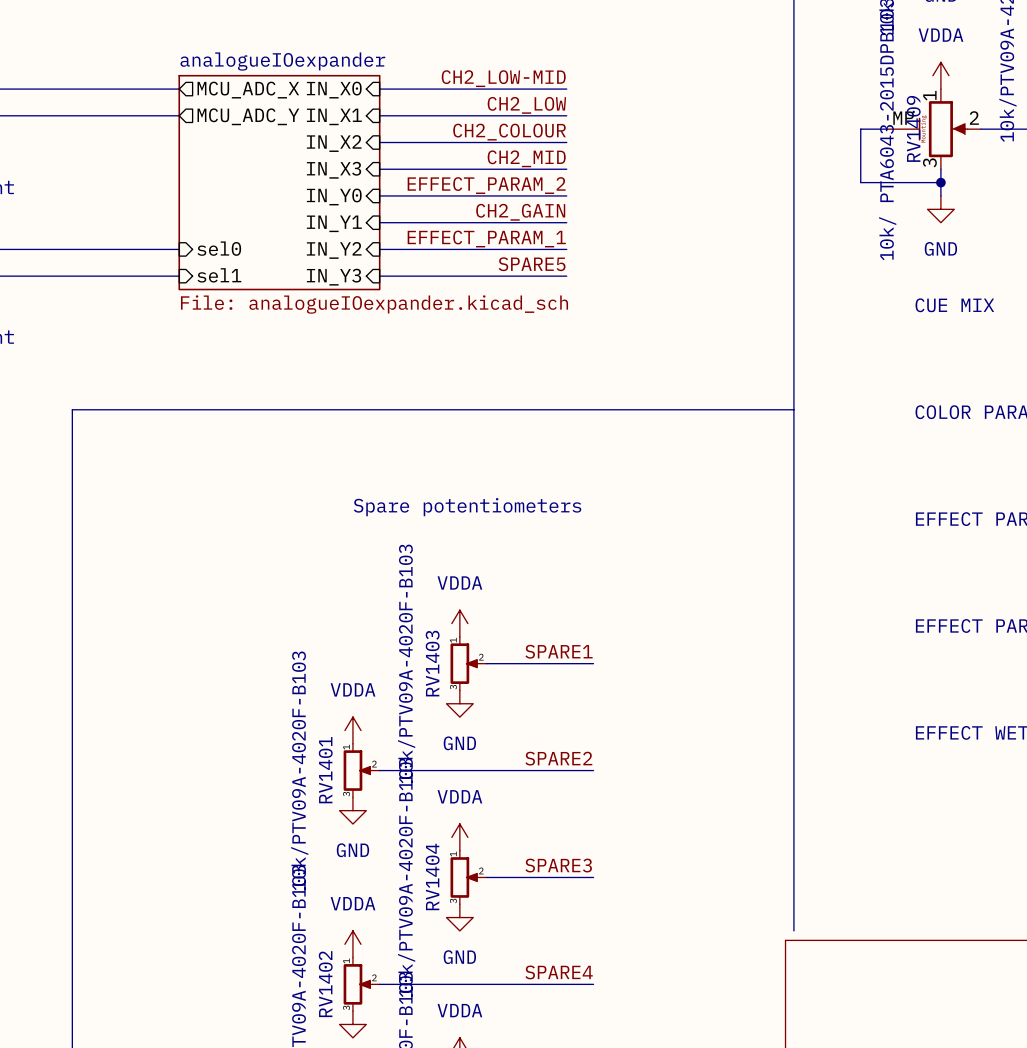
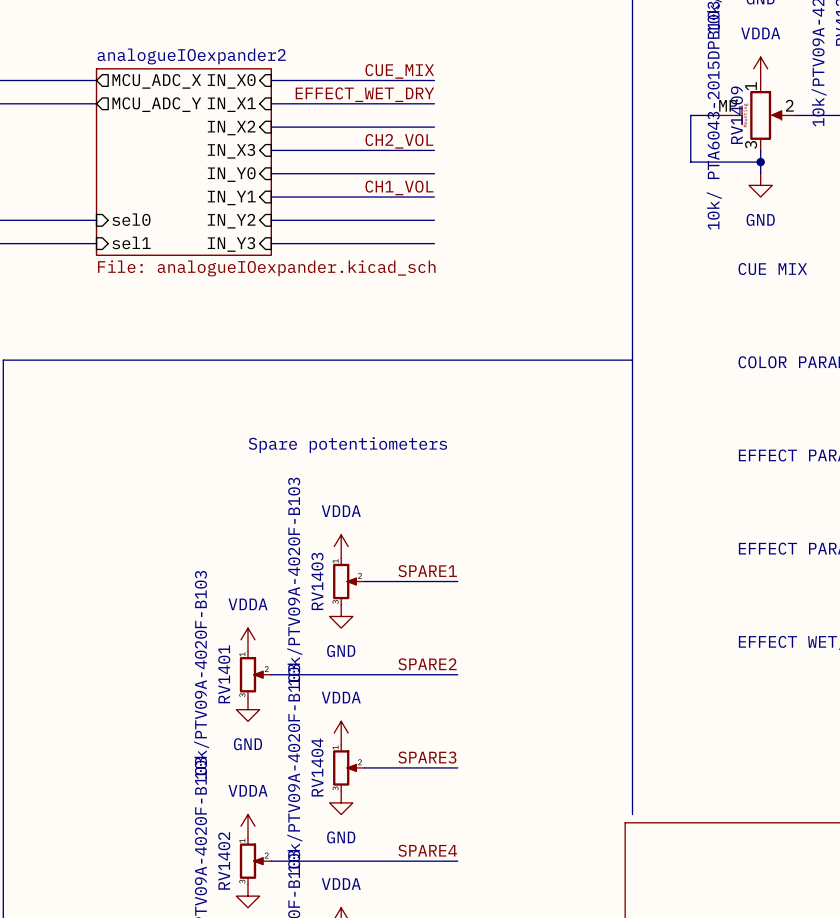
sheet analogueIOexpander name: analogueIOexpander (282, 61) -> analogueIOexpander2 (191, 56)
label: CH2_LOW-MID (503, 78) -> CUE_MIX (399, 71)
label: CH2_LOW (526, 105) -> EFFECT_WET_DRY (364, 94)
label: CH2_COLOUR (509, 132) -> none
label: CH2_MID (526, 158) -> CH2_VOL (399, 141)
label: EFFECT_PARAM_2 (486, 185) -> none
label: CH2_GAIN (520, 212) -> CH1_VOL (399, 187)
label: EFFECT_PARAM_1 (486, 239) -> none
label: SPARE5 (532, 264) -> none

